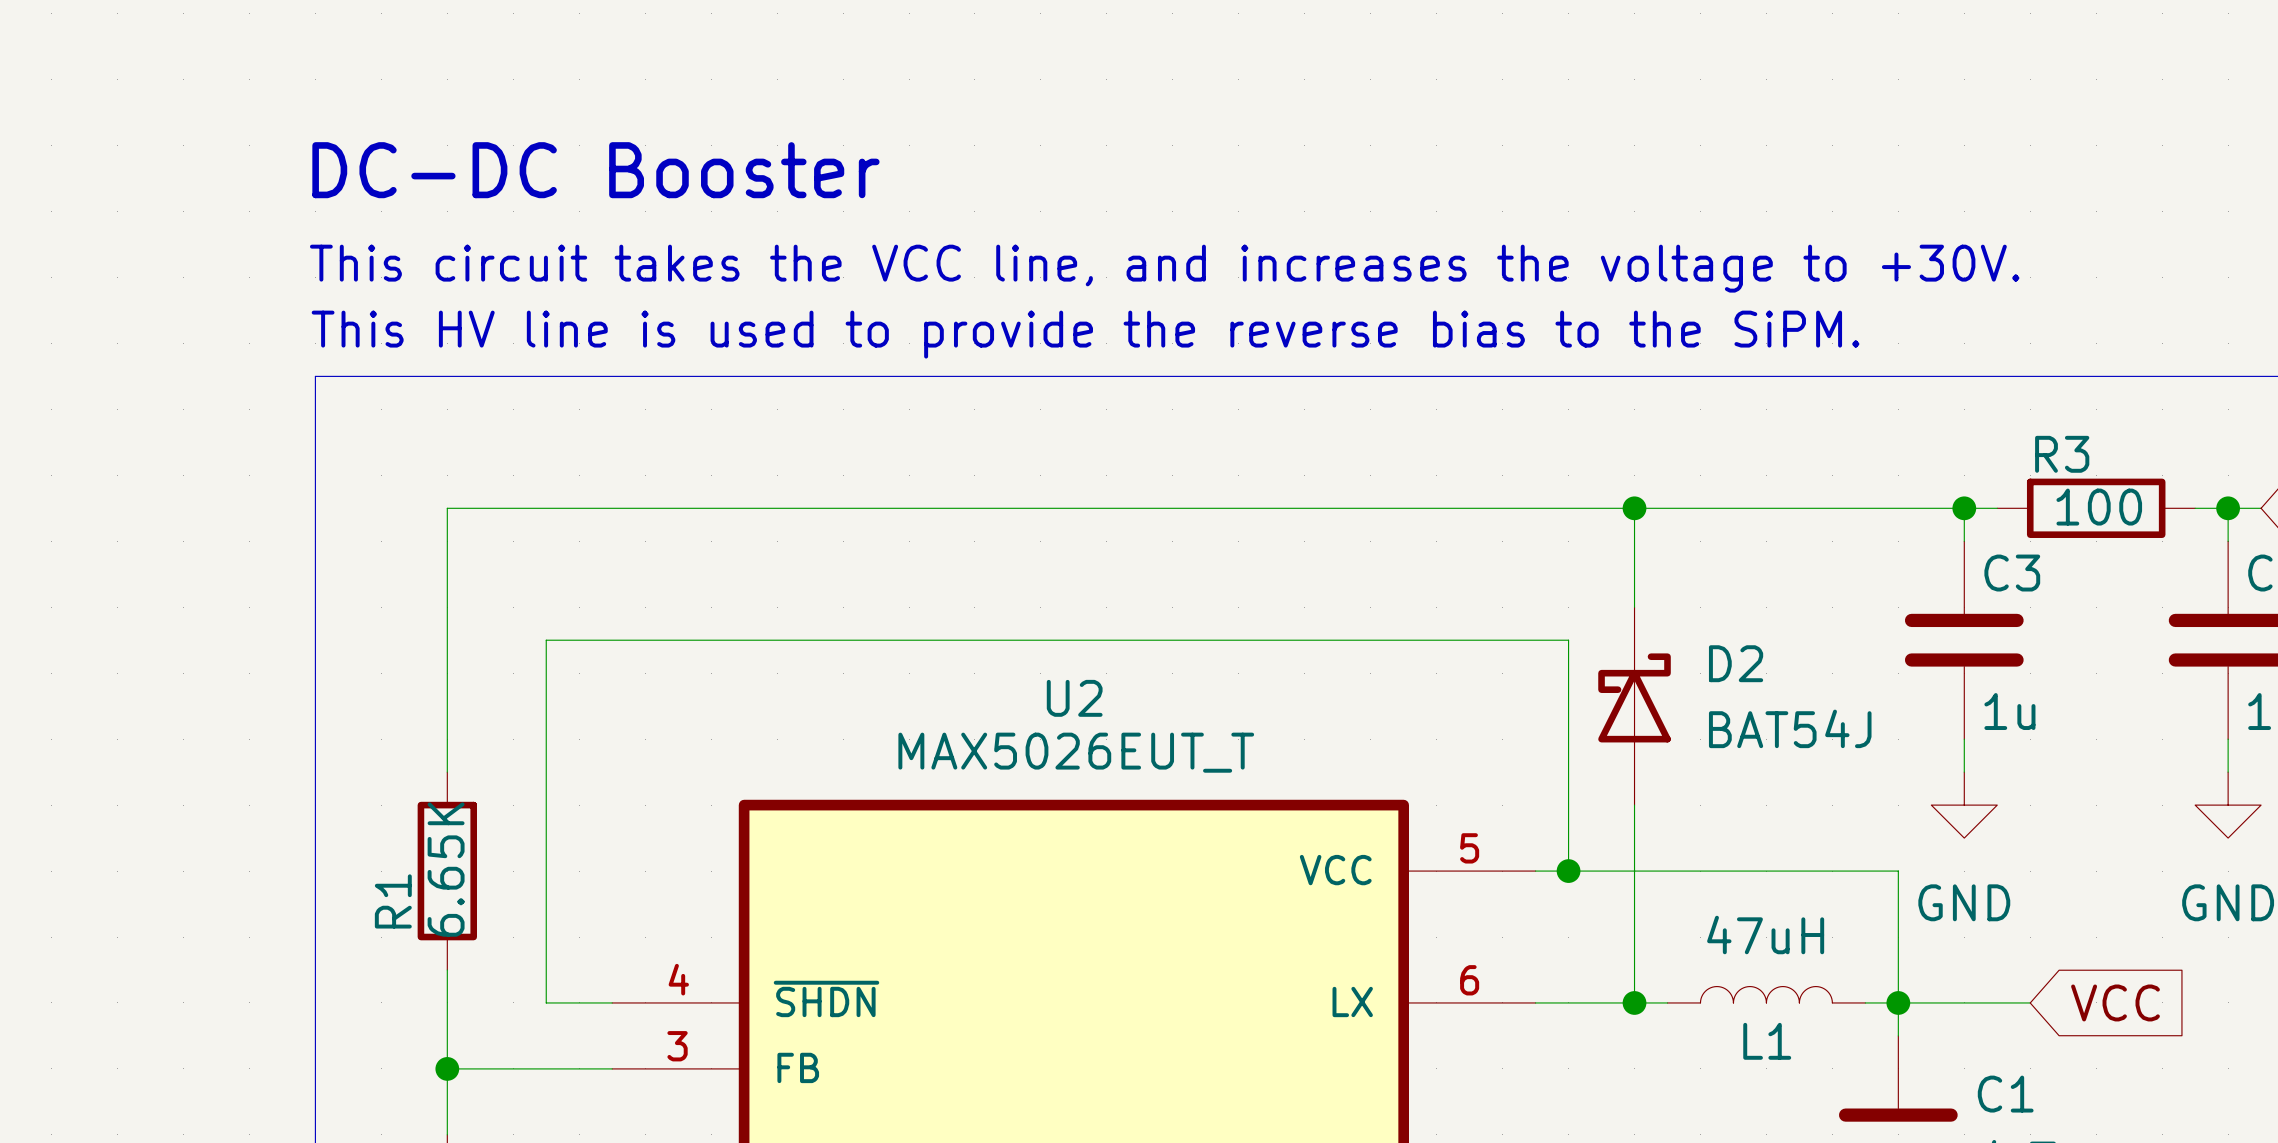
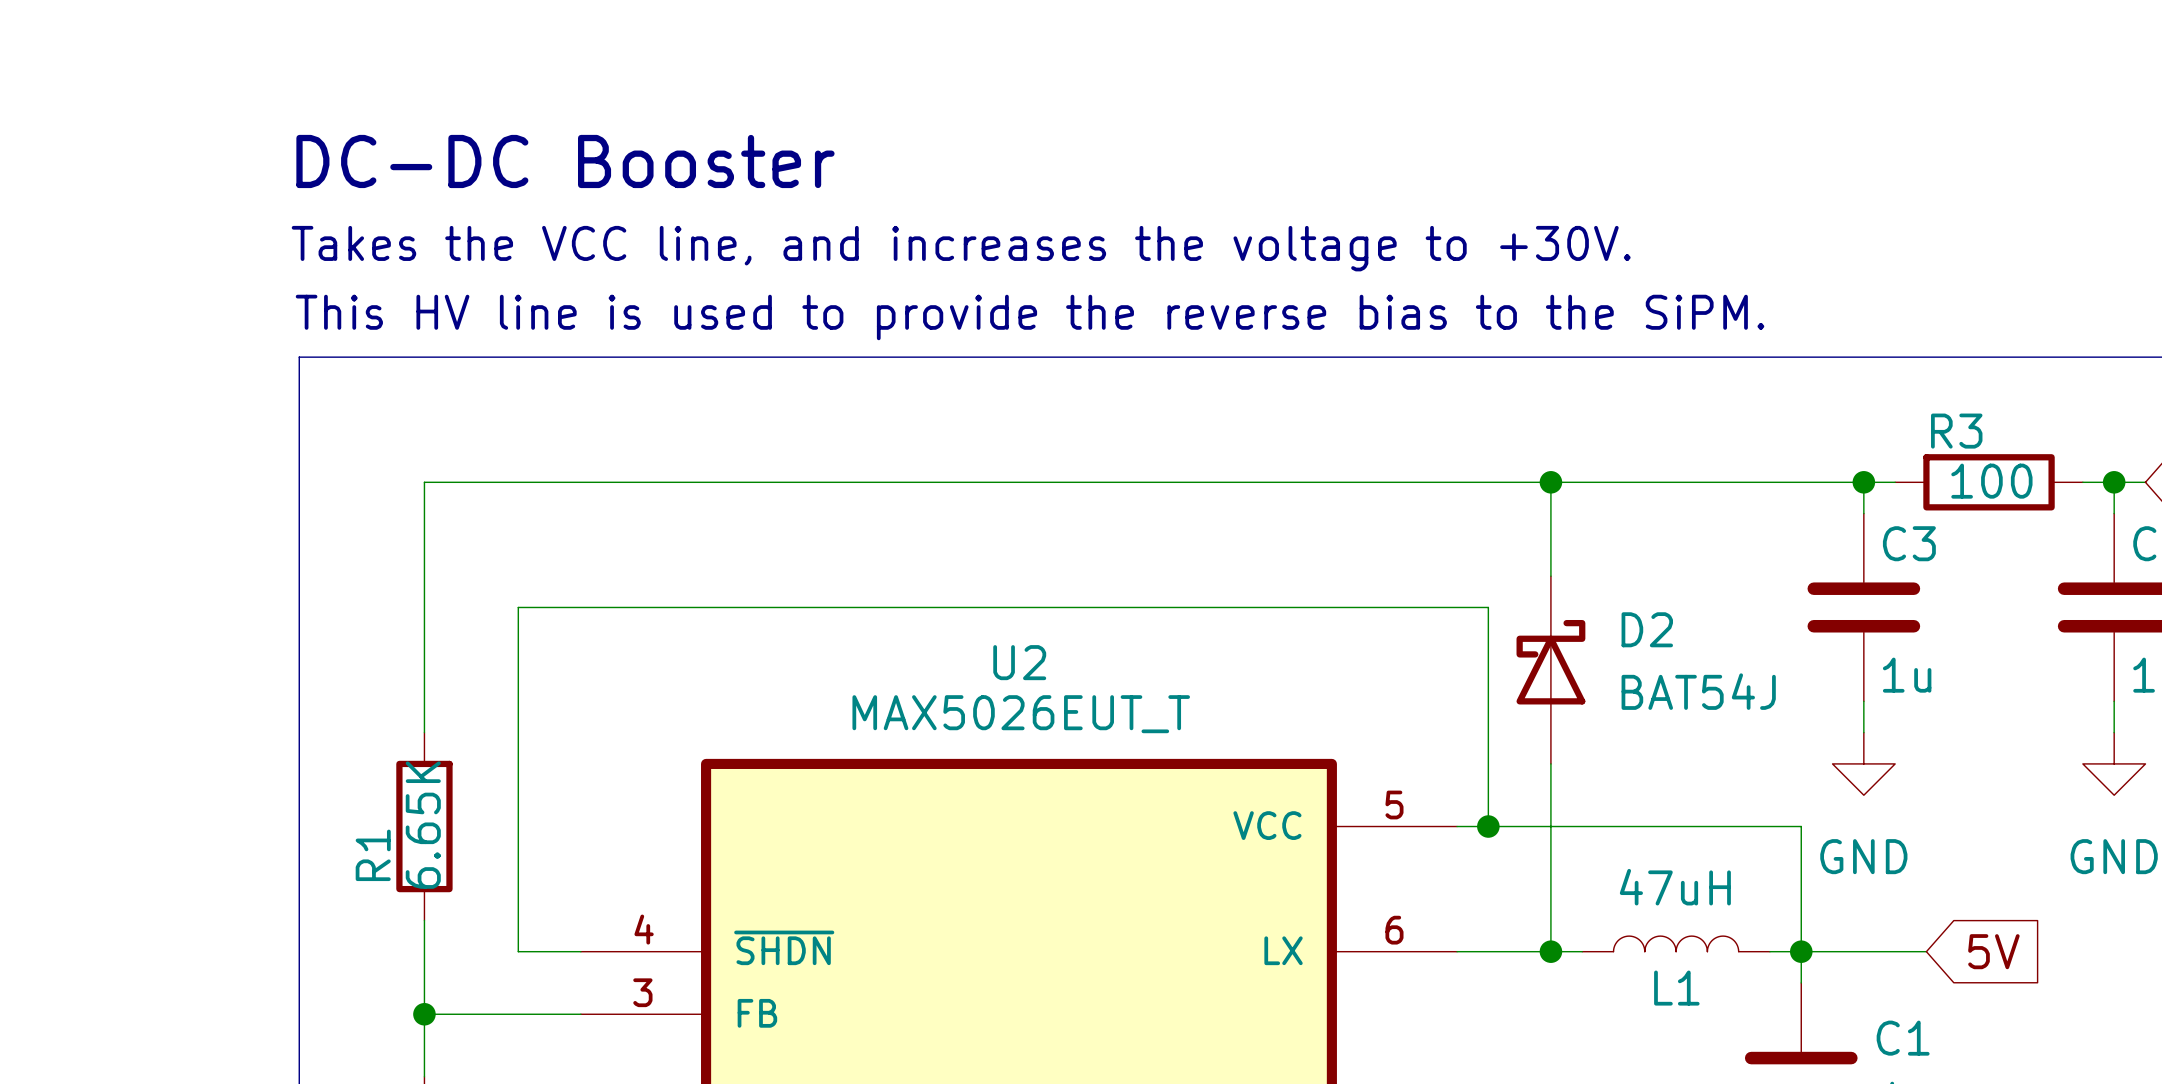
text: This circuit takes the VCC line, and increases the voltage to +30V. (1164, 268) -> Takes the VCC line, and increases the voltage to +30V. (961, 248)
global label: VCC (2115, 1002) -> 5V (1993, 951)

